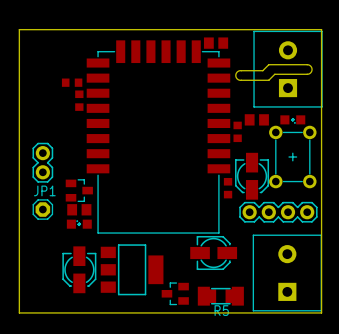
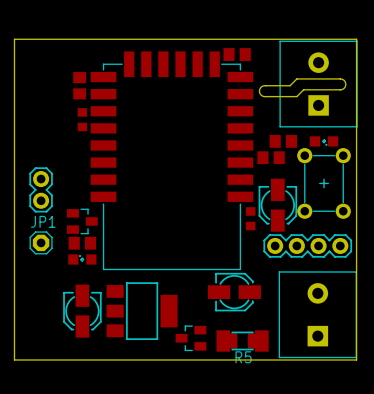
part: none -> (79, 85)
part: (72, 82) -> none
part: (237, 131) -> none
part: none -> (271, 157)

